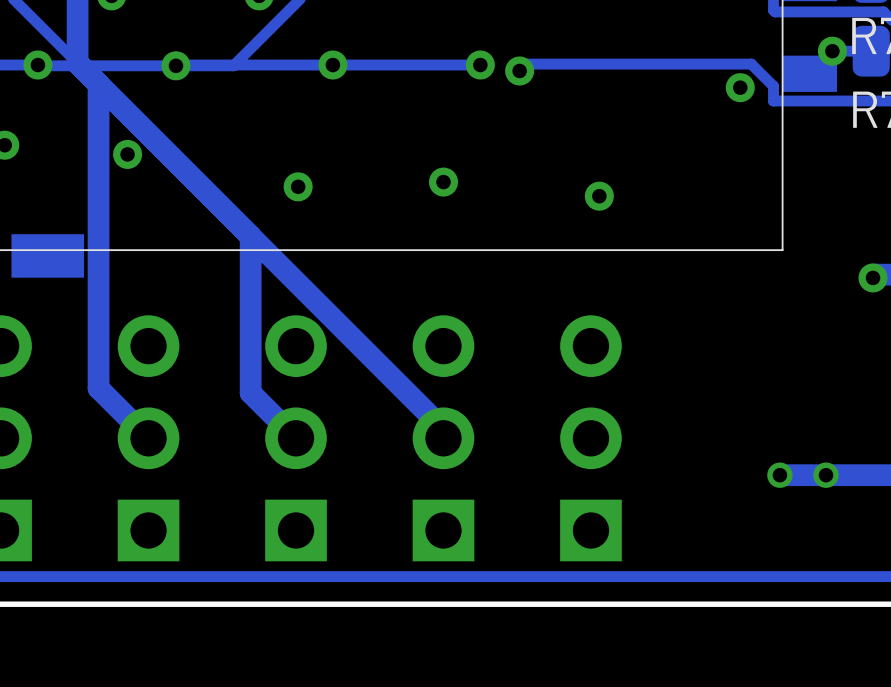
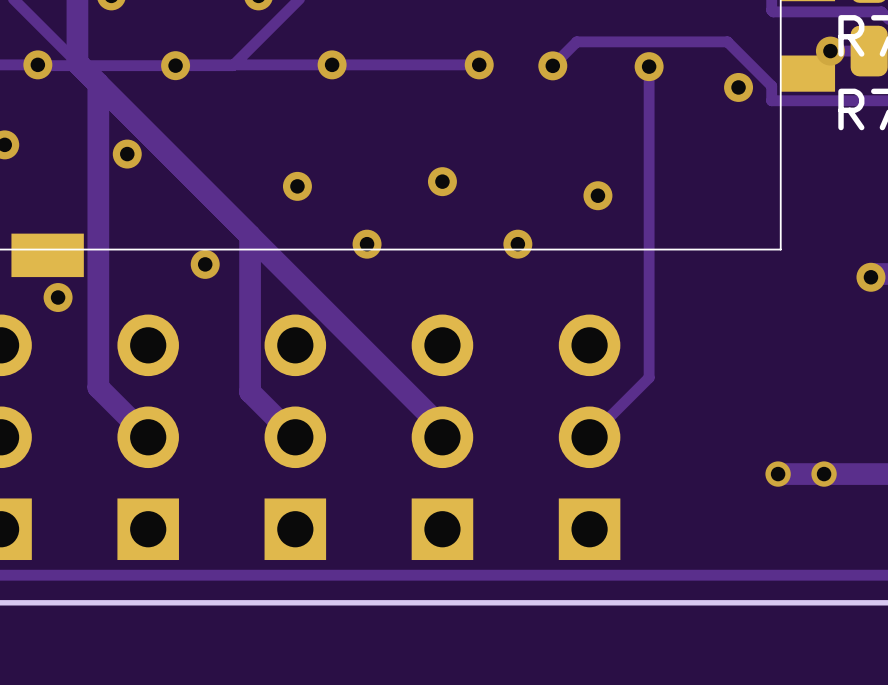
track: (751, 64) (526, 64) (519, 70) -> (749, 63) (727, 41) (576, 41) (552, 65)
track: none -> (649, 66) (649, 377) (589, 437)
via: none -> (649, 66)
via position: (519, 70) -> (552, 65)
via: none -> (367, 244)
via: none -> (517, 244)
via: none -> (205, 264)
via: none -> (58, 297)

